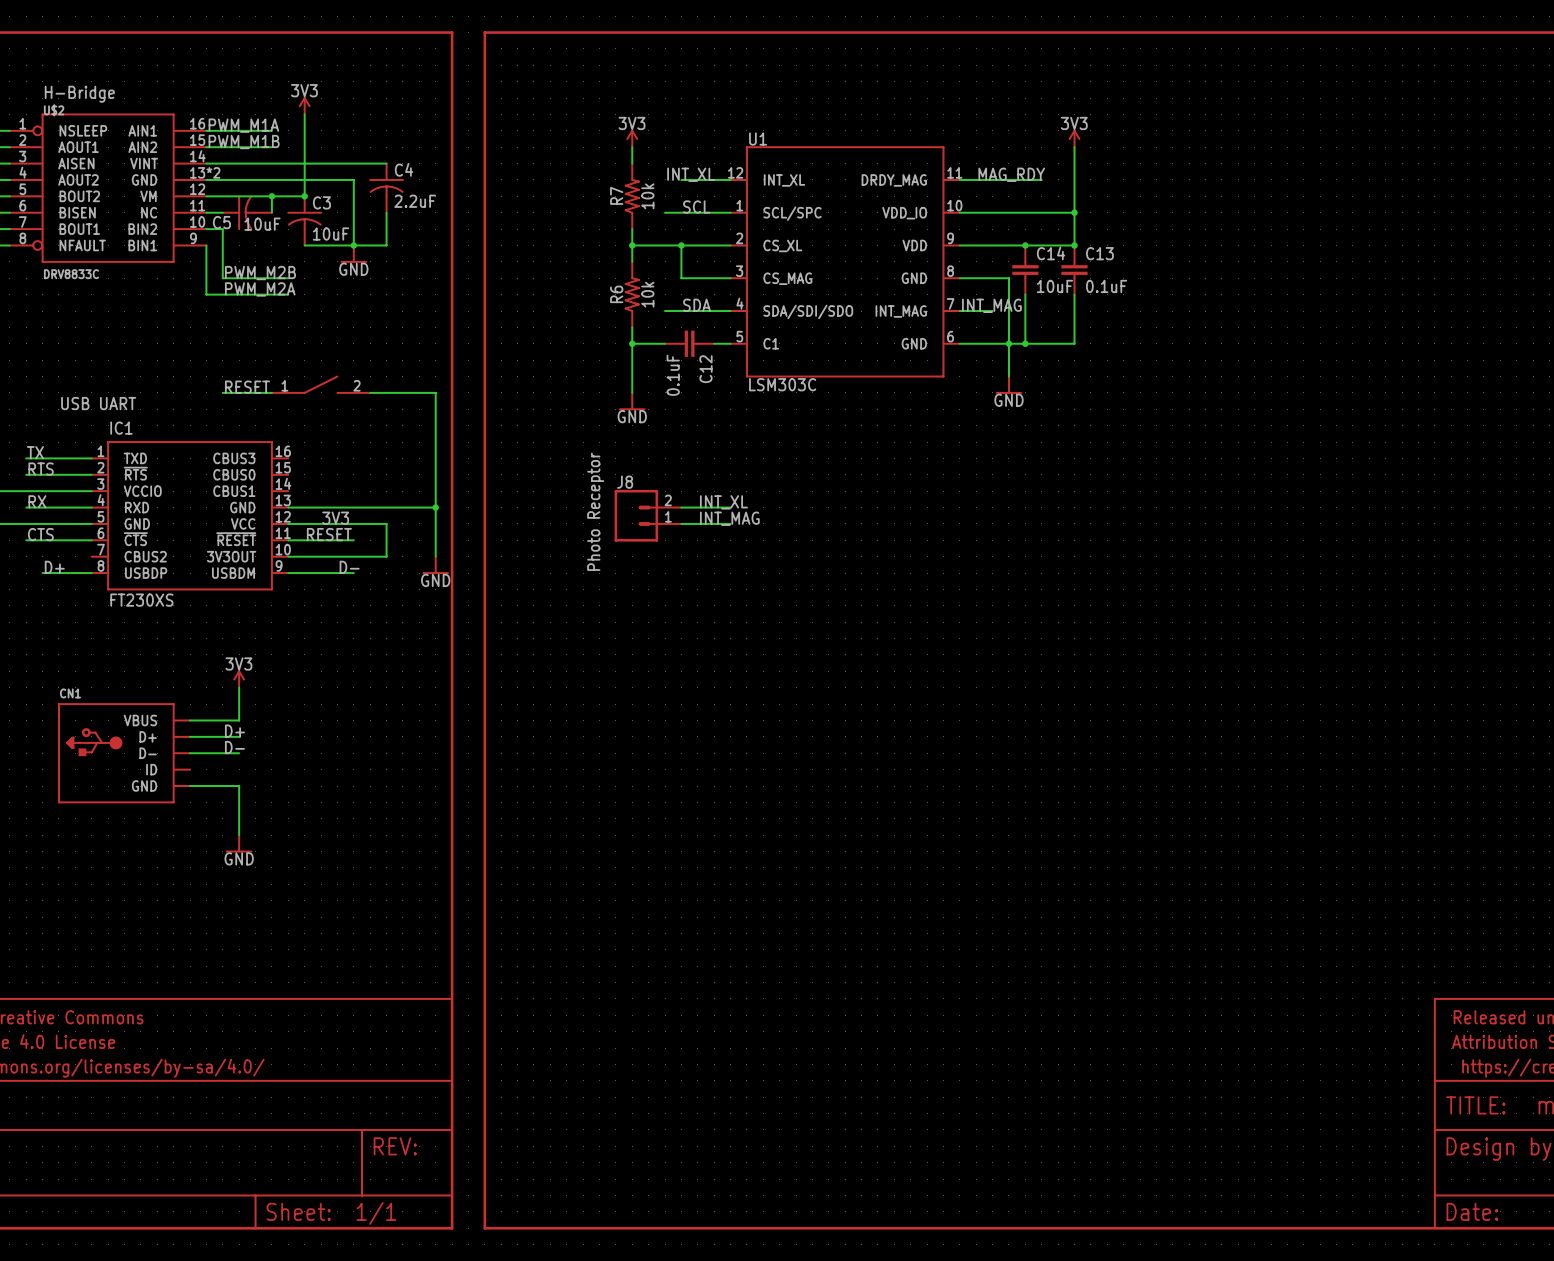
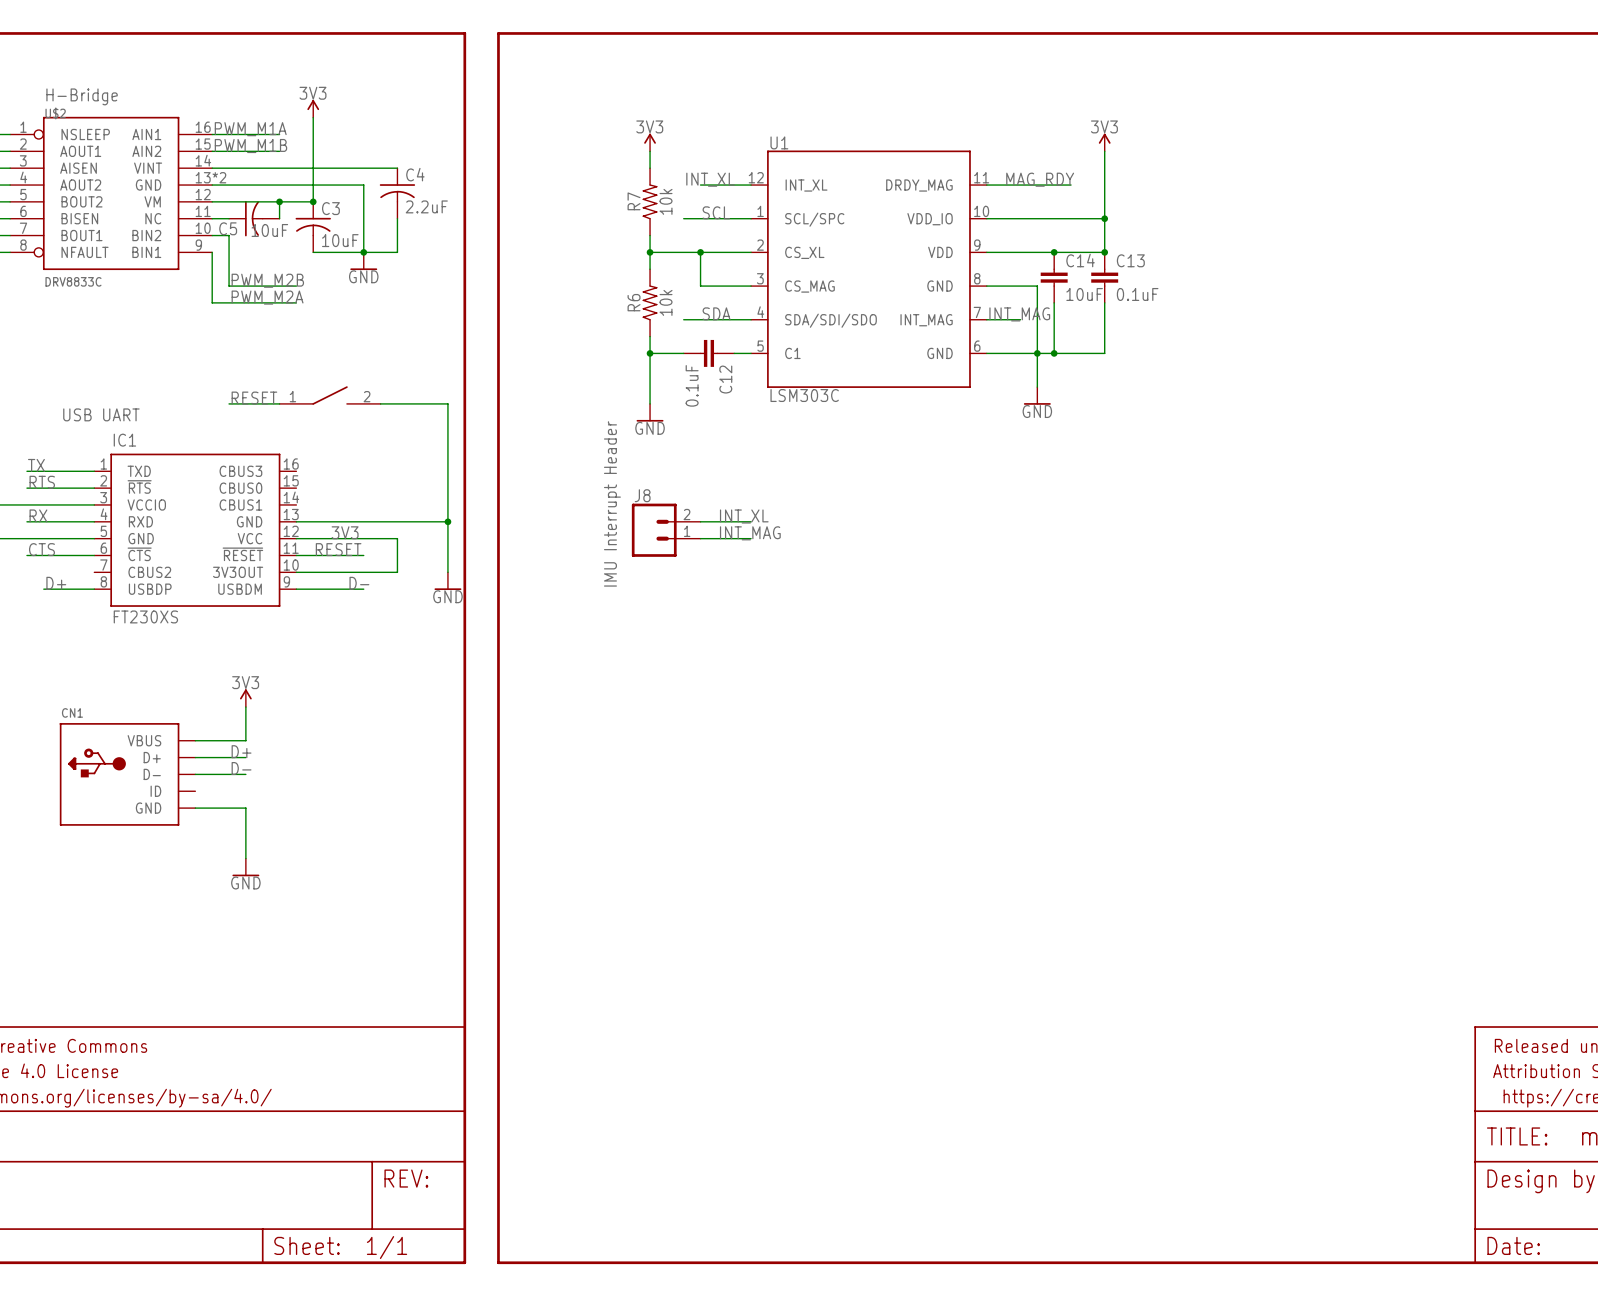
J8 text: Photo Receptor (595, 511) -> IMU Interrupt Header (612, 503)

